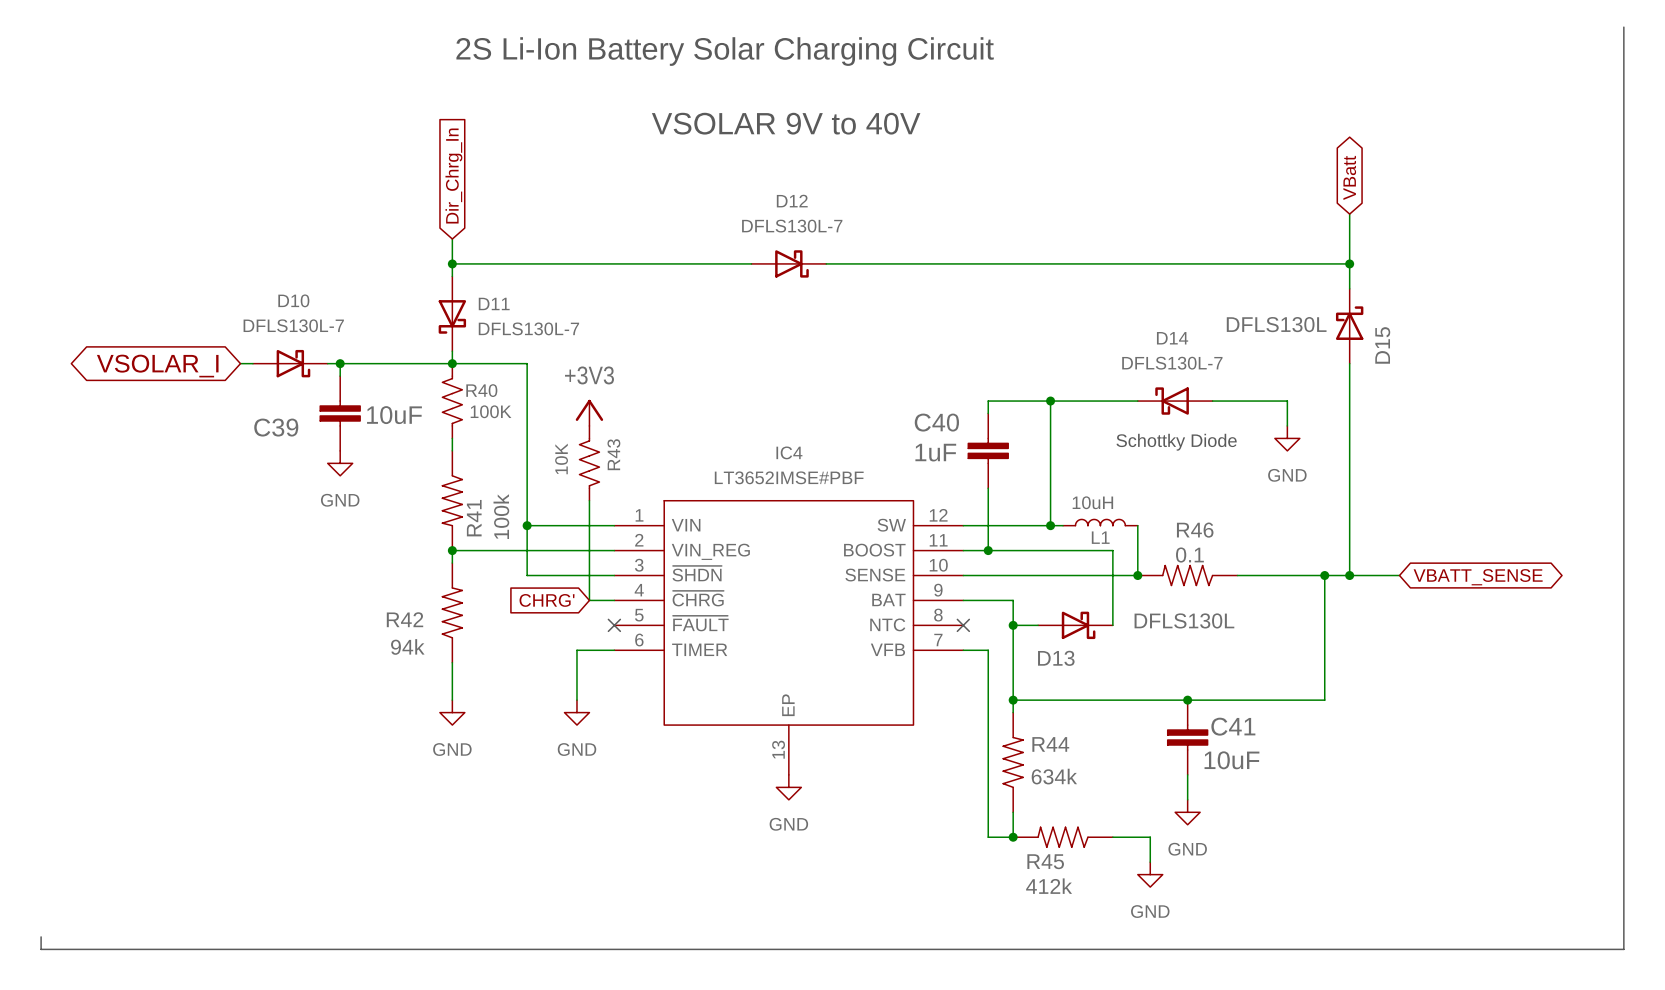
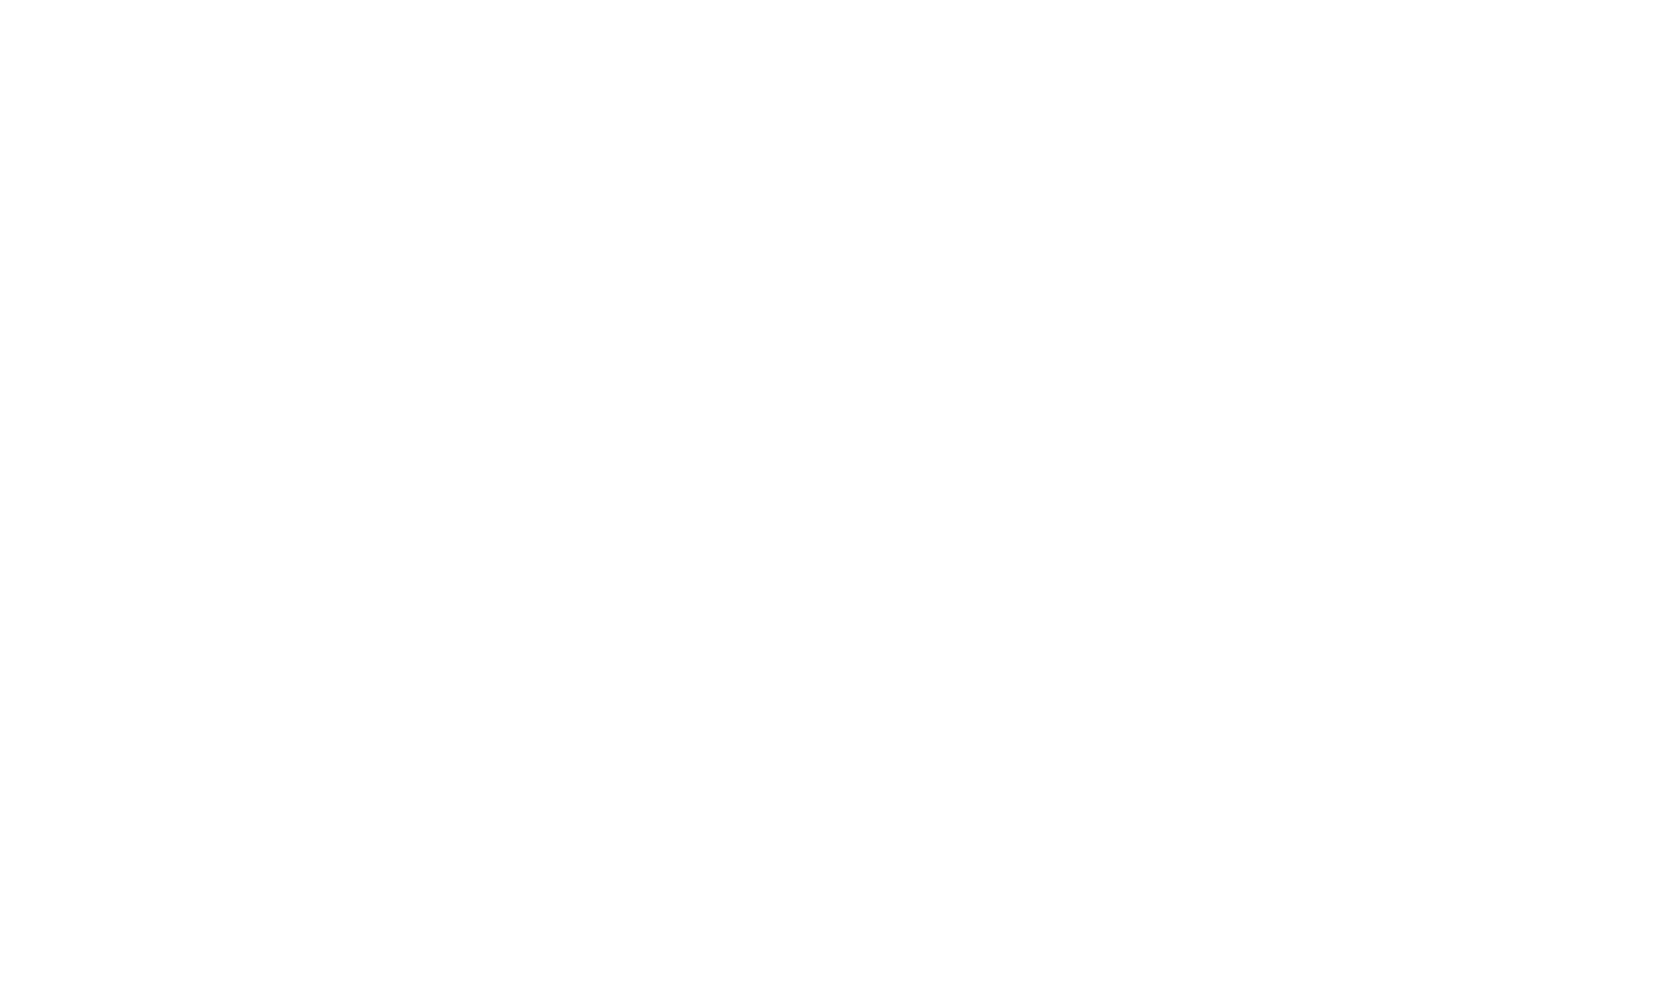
line: (1623, 27) (1623, 949) (41, 949) (41, 936) -> none
text: 2S Li-Ion Battery Solar Charging Circuit (725, 51) -> none
text: VSOLAR 9V to 40V (786, 123) -> none
global label: Dir_Chrg_In (453, 176) -> none
global label: VBatt (1349, 177) -> none
wire: (1349, 214) (1349, 288) -> none
wire: (452, 239) (452, 276) -> none
wire: (452, 263) (751, 263) -> none
junction: (452, 263) -> none
D12: DFLS130L-7 (788, 263) -> none
wire: (826, 263) (1349, 263) -> none
junction: (1349, 263) -> none
D11: DFLS130L-7 (452, 313) -> none
D15: DFLS130L (1349, 326) -> none
wire: (452, 351) (452, 363) -> none
wire: (240, 363) (252, 363) -> none
D10: DFLS130L-7 (290, 363) -> none
wire: (327, 363) (527, 363) (527, 575) (614, 575) -> none
wire: (340, 363) (340, 376) -> none
junction: (340, 363) -> none
junction: (452, 363) -> none
wire: (1349, 363) (1349, 575) -> none
global label: VSOLAR_I (157, 366) -> none
R40: 100K (452, 401) -> none
wire: (1050, 401) (1050, 525) -> none
junction: (1050, 401) -> none
wire: (1137, 401) (988, 401) (988, 413) -> none
D14: DFLS130L-7 (1175, 401) -> none
wire: (1212, 401) (1287, 401) (1287, 425) -> none
power symbol: +3V3 (589, 412) -> none
C39: 10uF (340, 413) -> none
wire: (452, 438) (452, 450) -> none
power symbol: GND (1287, 438) -> none
text: Schottky Diode (1176, 442) -> none
C40: 1uF (988, 450) -> none
power symbol: GND (340, 463) -> none
R43: 10K (589, 463) -> none
wire: (988, 488) (988, 550) -> none
R41: 100k (452, 500) -> none
wire: (589, 500) (589, 600) (614, 600) -> none
L1: 10uH (1100, 522) -> none
wire: (527, 525) (614, 525) -> none
junction: (527, 525) -> none
wire: (963, 525) (1063, 525) -> none
junction: (1050, 525) -> none
wire: (1137, 525) (1137, 575) (963, 575) -> none
junction: (452, 550) -> none
wire: (614, 550) (452, 550) (452, 563) -> none
wire: (963, 550) (1112, 550) (1112, 625) -> none
junction: (988, 550) -> none
junction: (1137, 575) -> none
R46: 0.1 (1187, 575) -> none
wire: (1237, 575) (1399, 575) -> none
wire: (1324, 575) (1324, 700) (1013, 700) -> none
junction: (1324, 575) -> none
junction: (1349, 575) -> none
global label: VBATT_SENSE (1478, 577) -> none
global label: CHRG' (547, 600) -> none
wire: (963, 600) (1013, 600) (1013, 712) -> none
R42: 94k (452, 612) -> none
no-connect mark: (614, 625) -> none
no-connect mark: (963, 625) -> none
wire: (1013, 625) (1038, 625) -> none
junction: (1013, 625) -> none
D13: DFLS130L (1075, 625) -> none
IC4: LT3652IMSE#PBF (788, 637) -> none
wire: (614, 650) (576, 650) (576, 700) -> none
wire: (963, 650) (988, 650) (988, 837) (1013, 837) (1013, 812) -> none
wire: (452, 662) (452, 700) -> none
junction: (1013, 700) -> none
junction: (1187, 700) -> none
power symbol: GND (452, 712) -> none
power symbol: GND (576, 712) -> none
C41: 10uF (1187, 737) -> none
R44: 634k (1013, 762) -> none
wire: (1187, 774) (1187, 799) -> none
power symbol: GND (788, 787) -> none
power symbol: GND (1187, 812) -> none
junction: (1013, 837) -> none
R45: 412k (1063, 837) -> none
wire: (1112, 837) (1150, 837) (1150, 862) -> none
power symbol: GND (1150, 874) -> none

